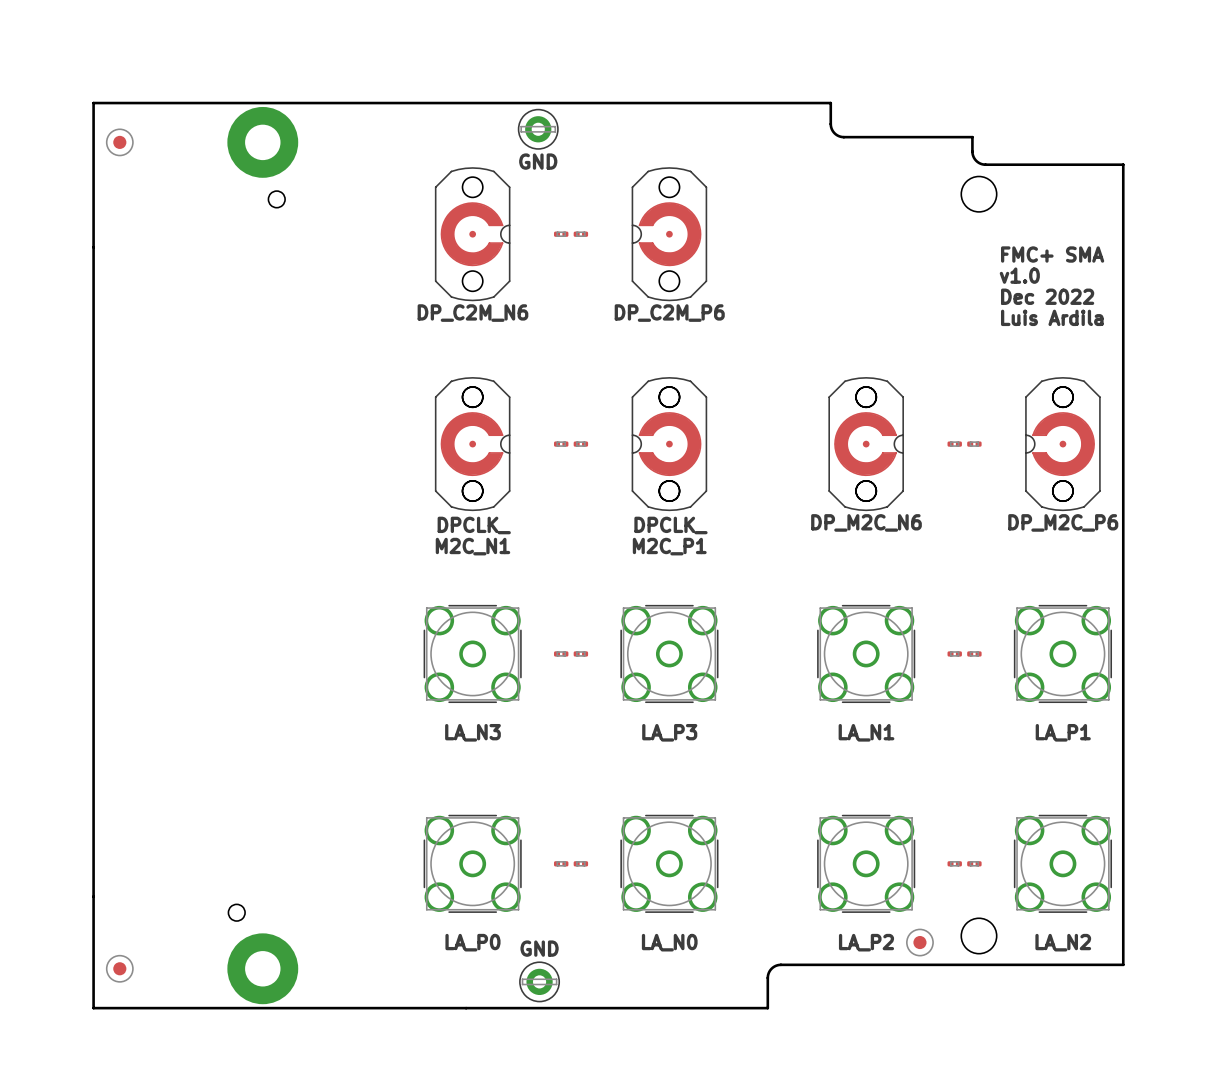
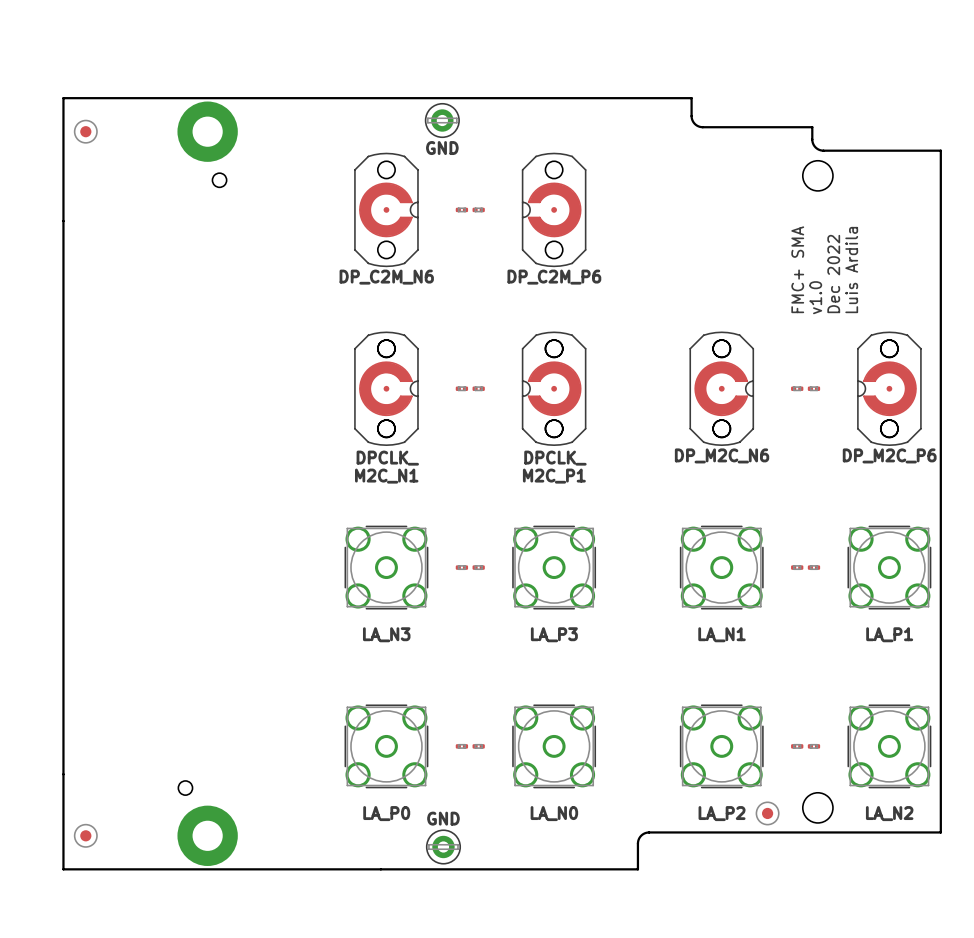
text rotation: 0° (1052, 254) -> 90° counterclockwise (797, 269)
text rotation: 0° (1019, 275) -> 90° counterclockwise (815, 297)
text position: v1.0 (1019, 275) -> v1.0 (815, 297)
text rotation: 0° (1047, 296) -> 90° counterclockwise (833, 274)
text rotation: 0° (1052, 317) -> 90° counterclockwise (851, 270)

